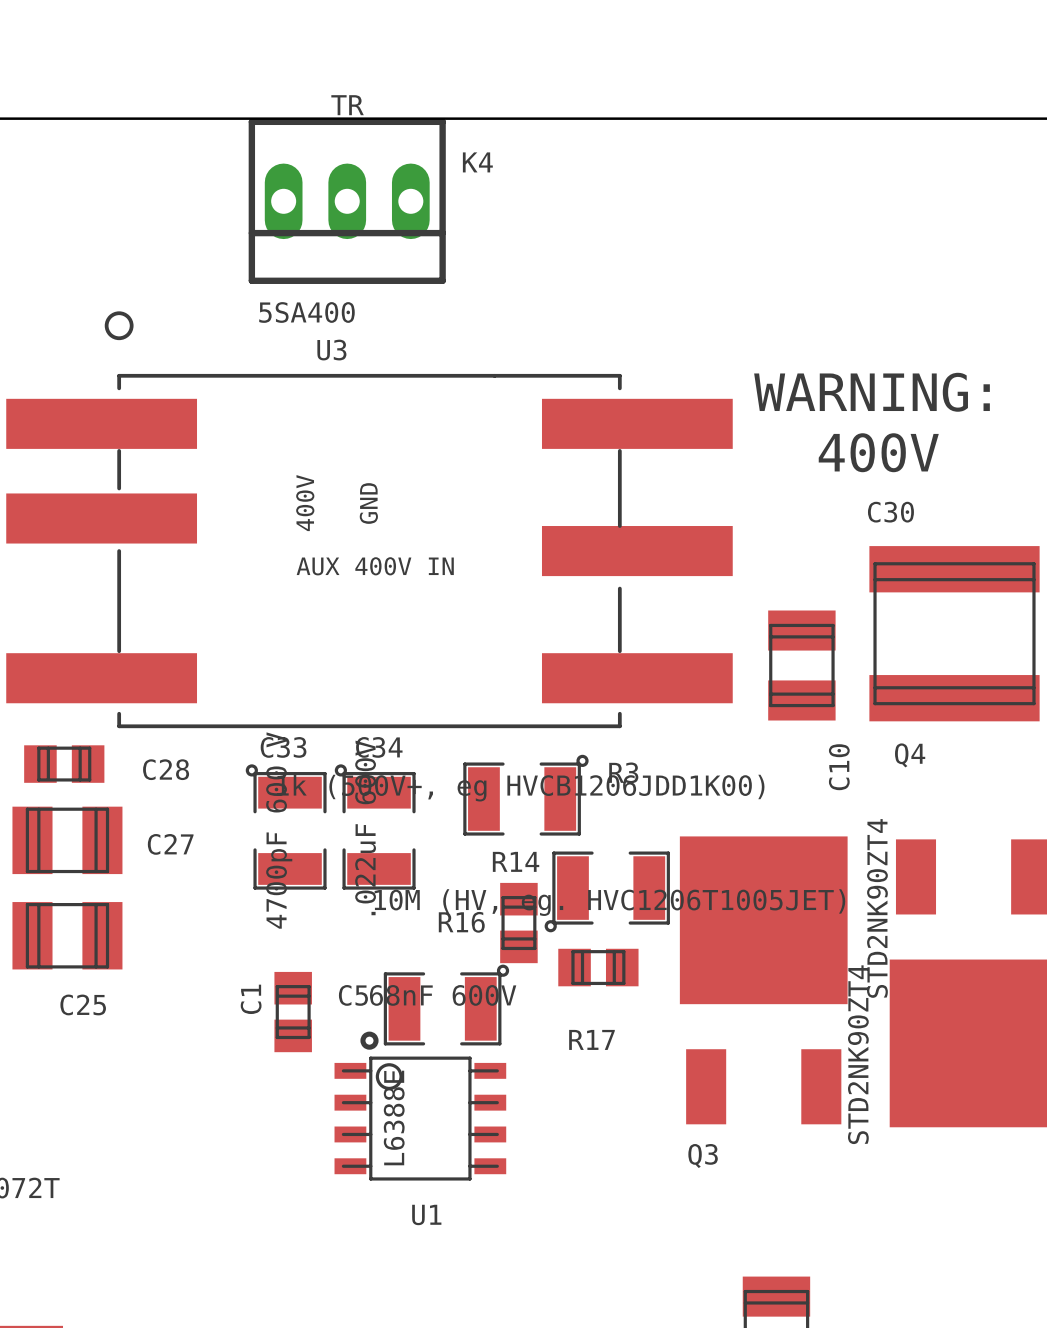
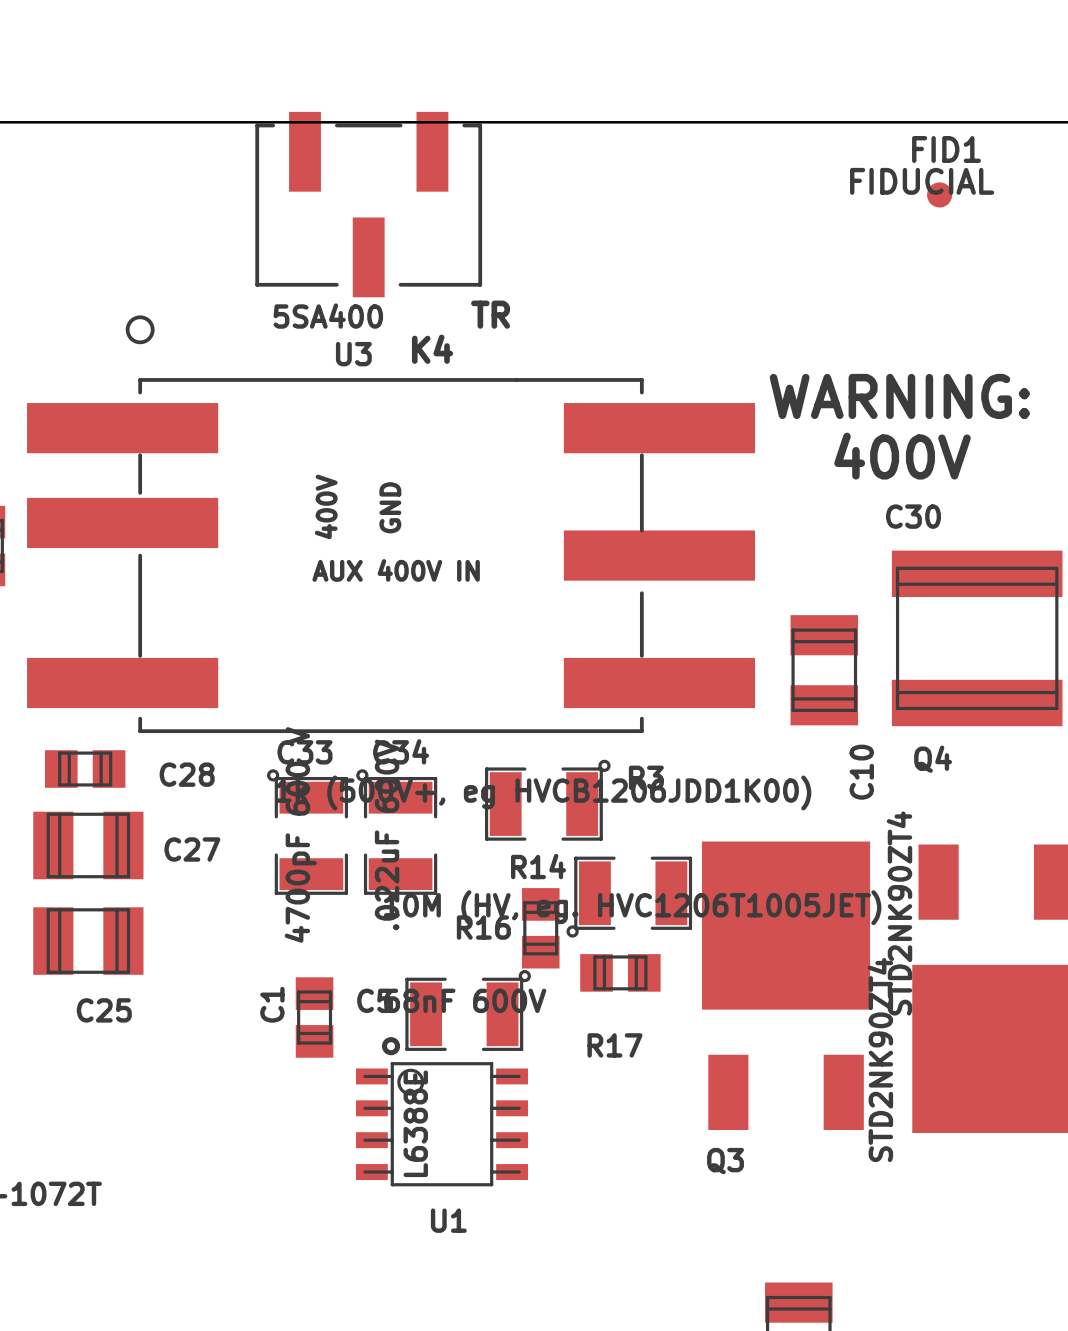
K4 value position: TR (347, 105) -> TR (490, 314)
K4 footprint: [248, 118, 446, 284] -> [255, 111, 483, 298]
K4 name position: K4 (477, 162) -> K4 (432, 349)
FID1: none -> FIDUCIAL (939, 194)

